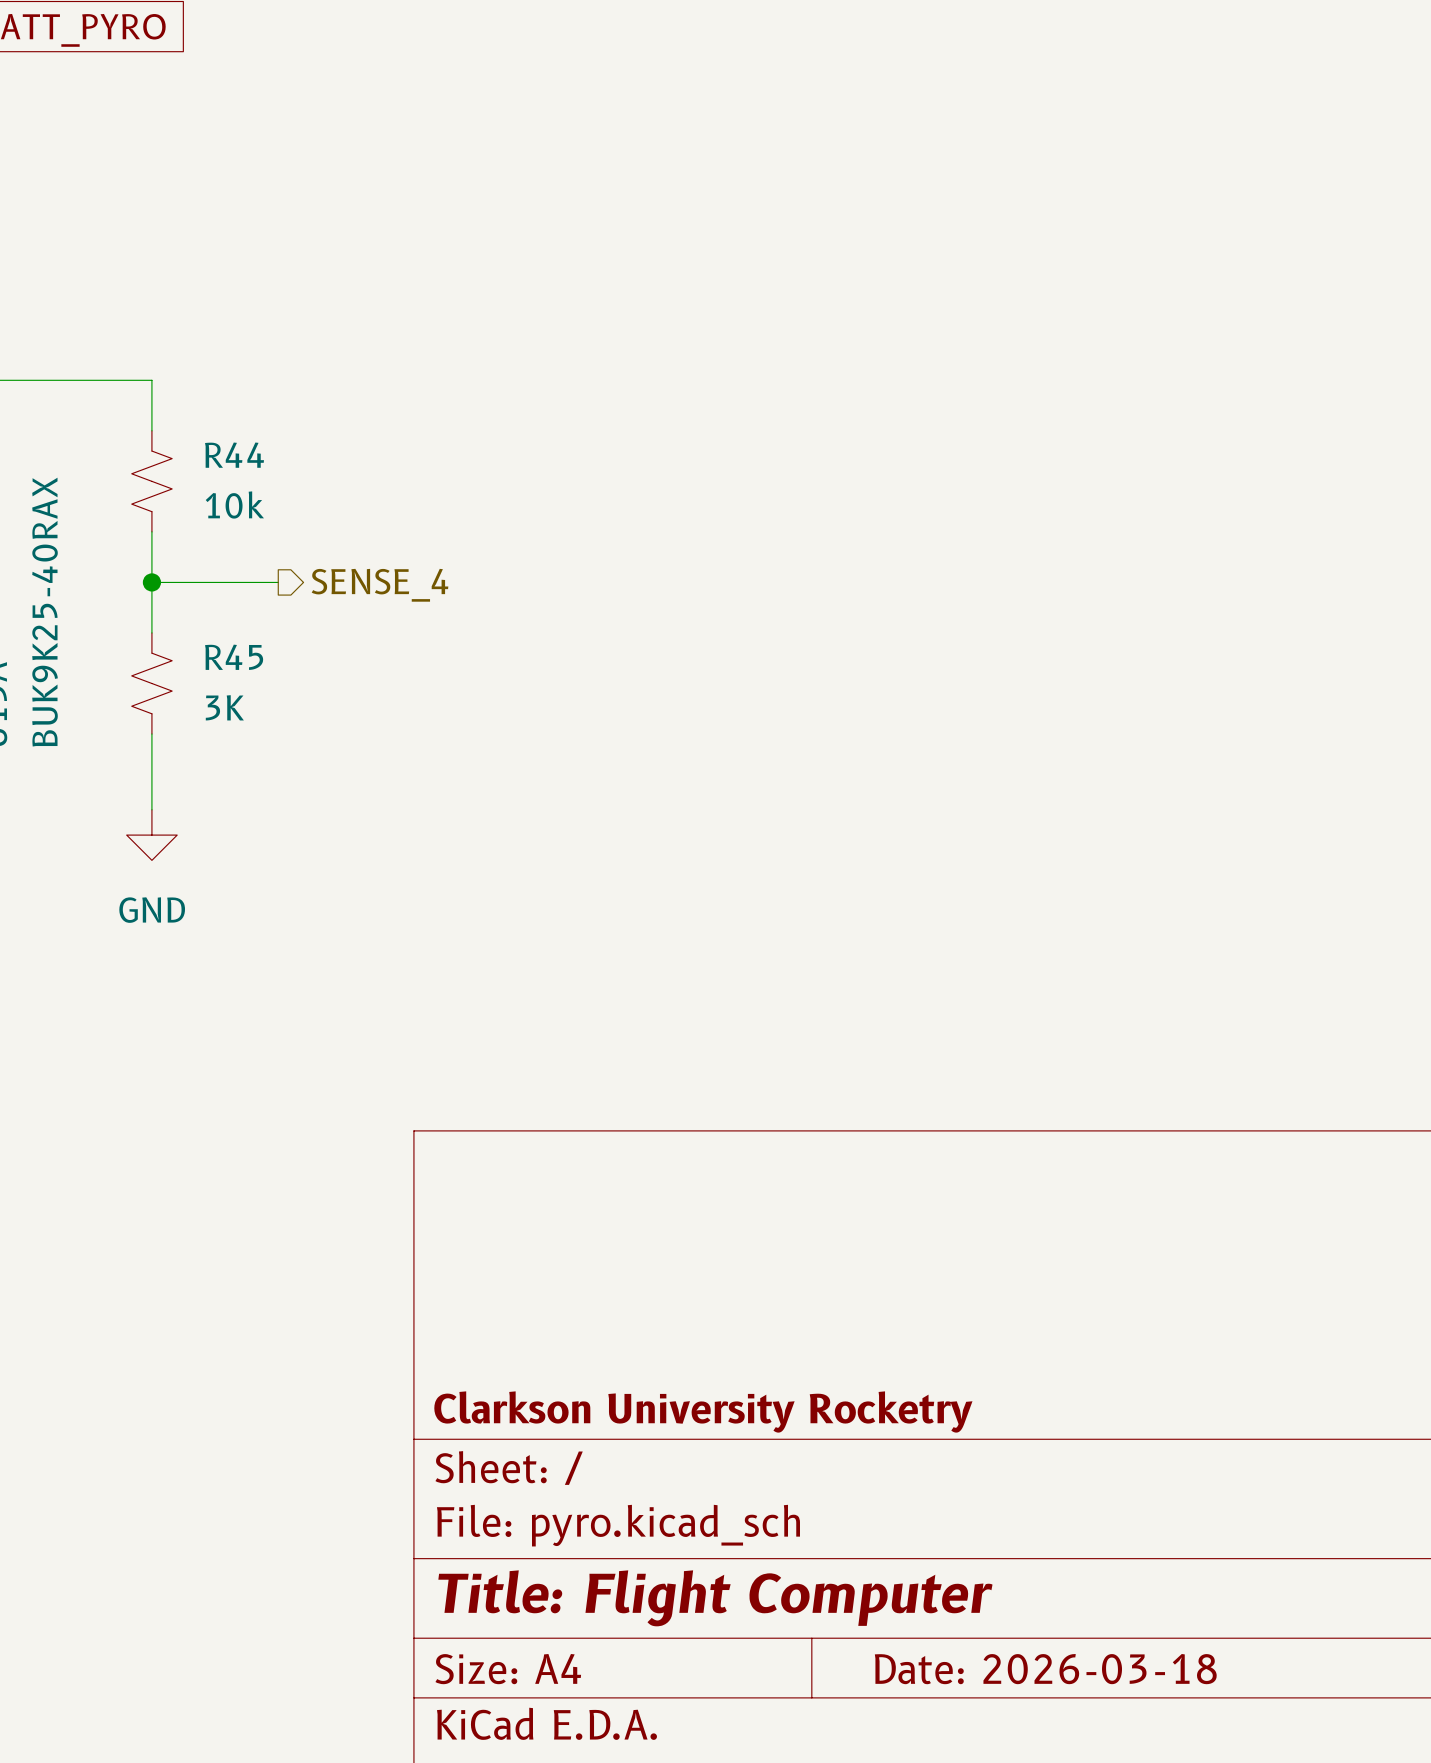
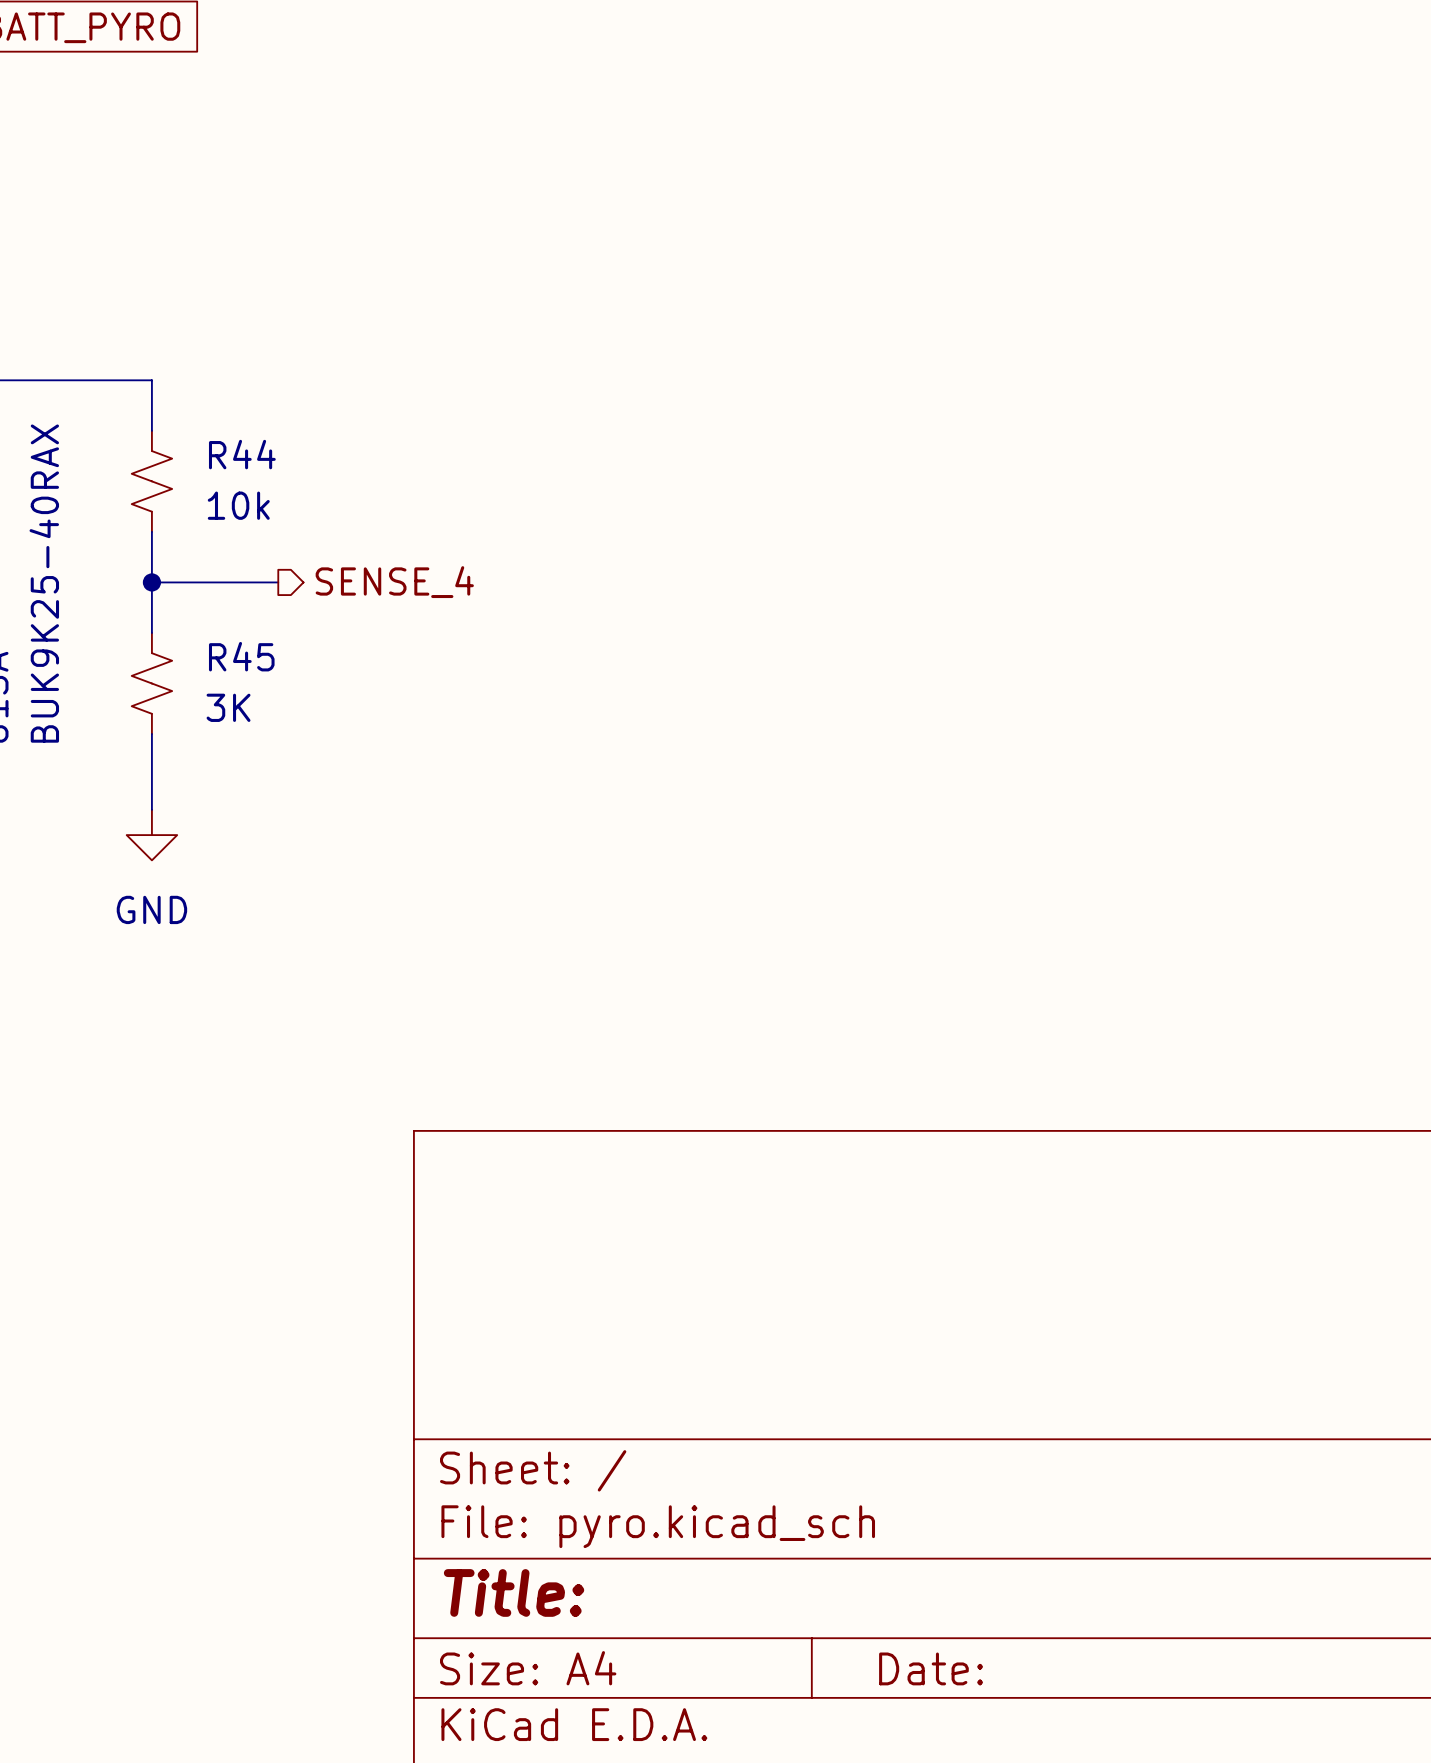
title block: Clarkson University Rocketry (703, 1411) -> none
title block: Title: Flight Computer (715, 1598) -> Title: (514, 1592)
title block: Date: 2026-03-18 (1045, 1669) -> Date: (931, 1668)

